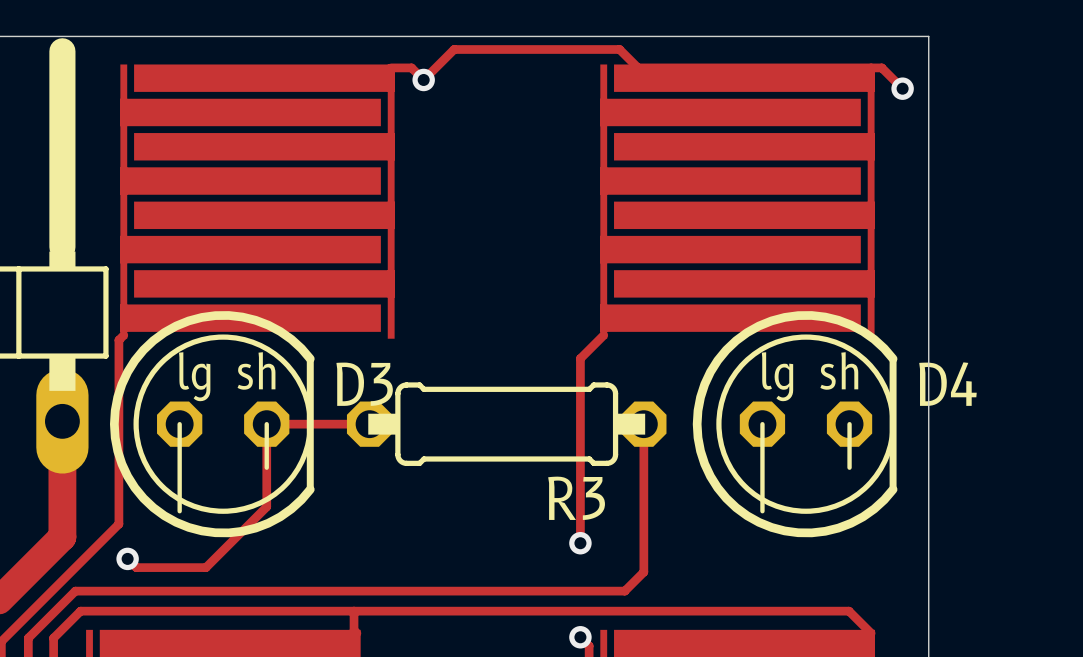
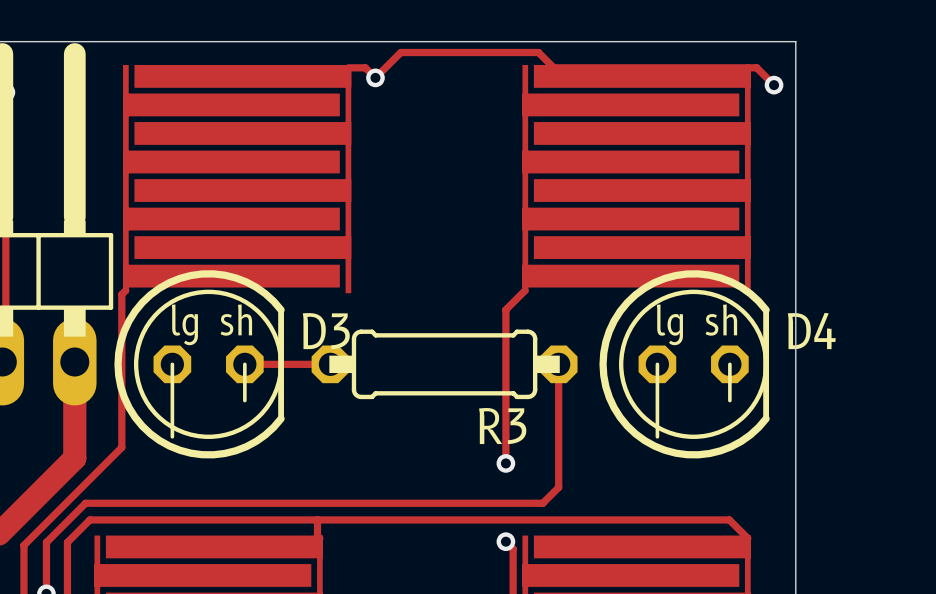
track: (266, 424) (266, 506) (205, 567) (136, 567) (127, 558) -> none
via: (127, 558) -> none

